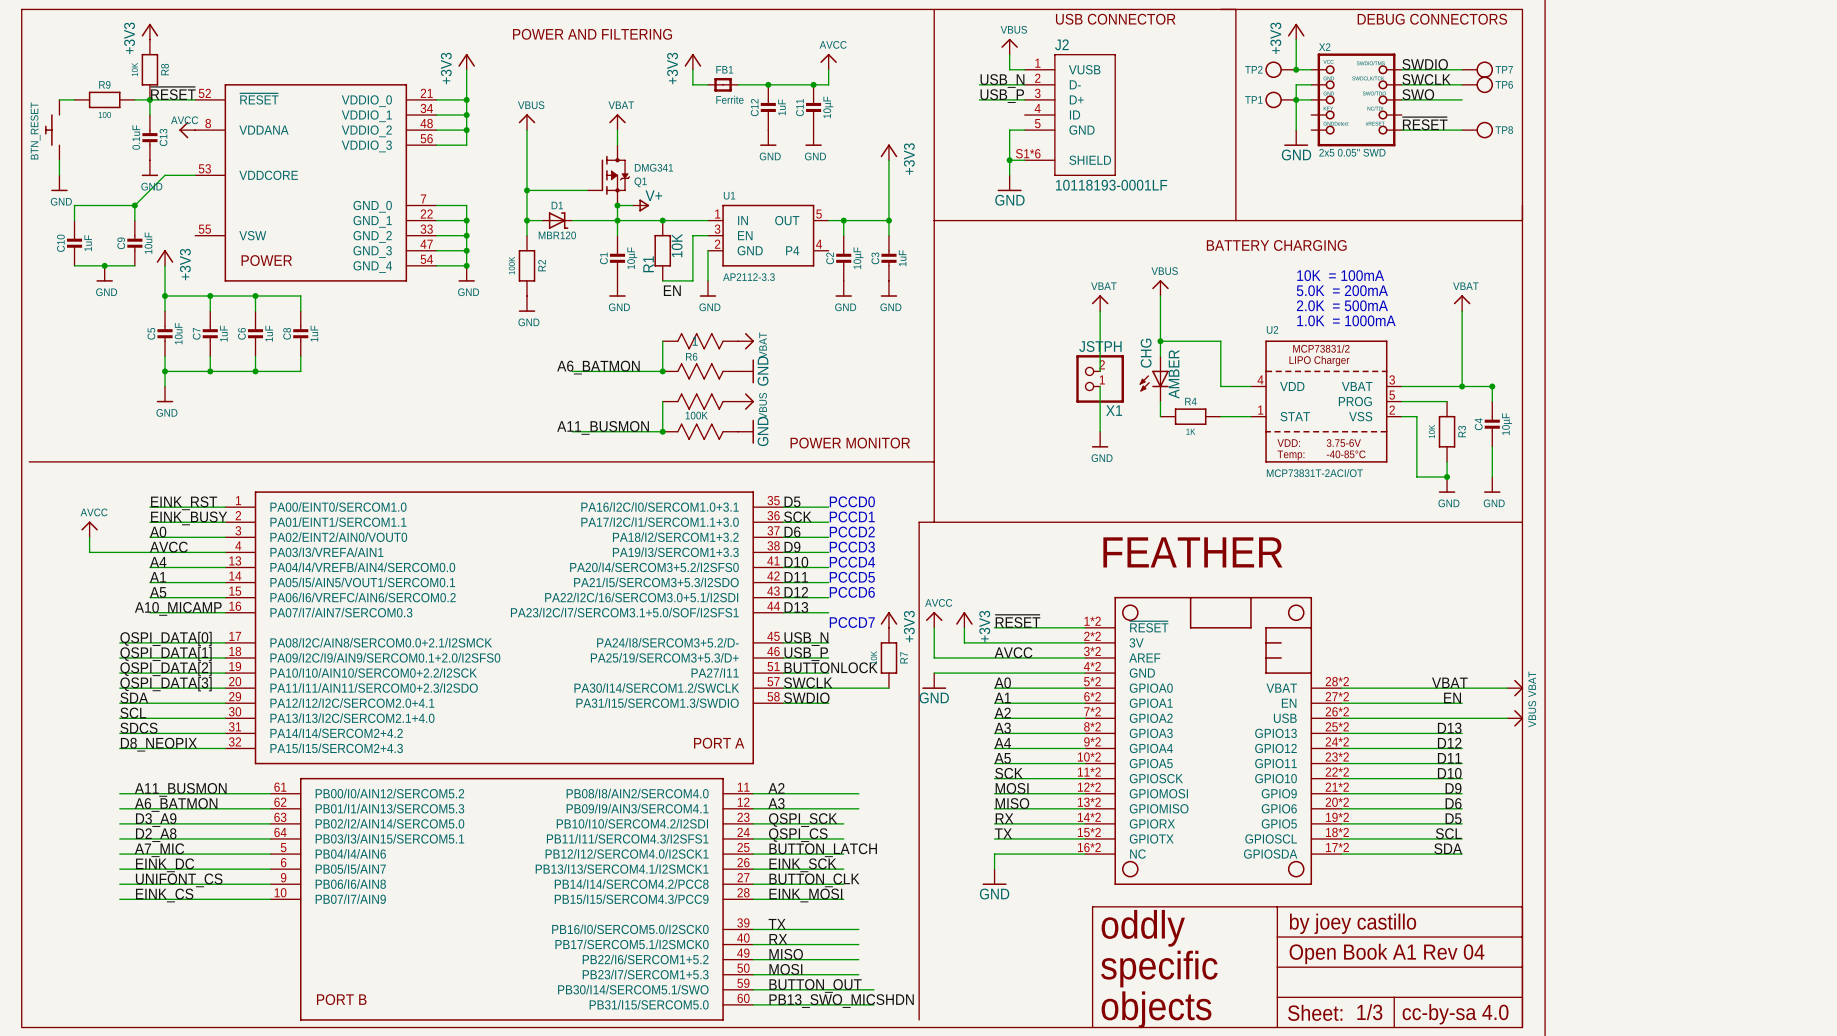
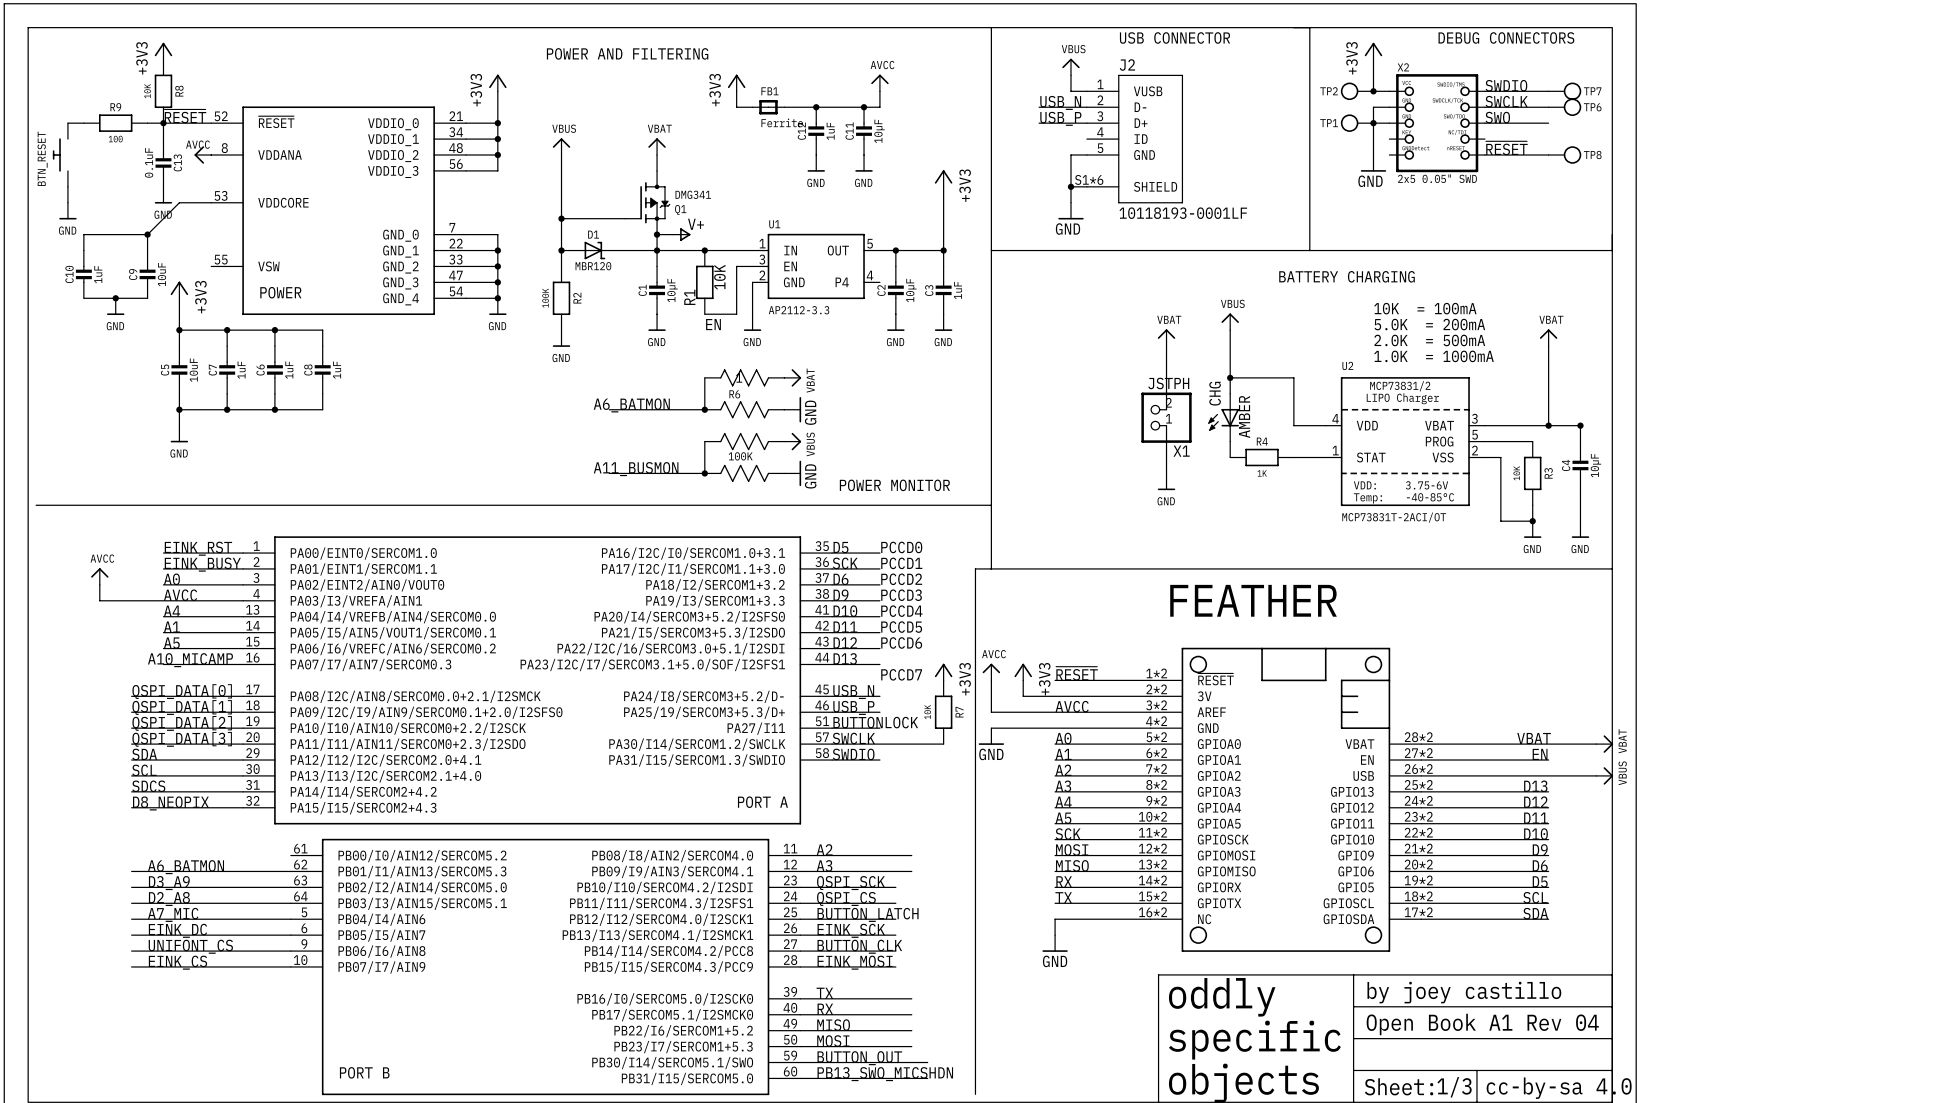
label: A11_BUSMON (180, 789) -> none
wire: (119, 793) (270, 793) -> none

